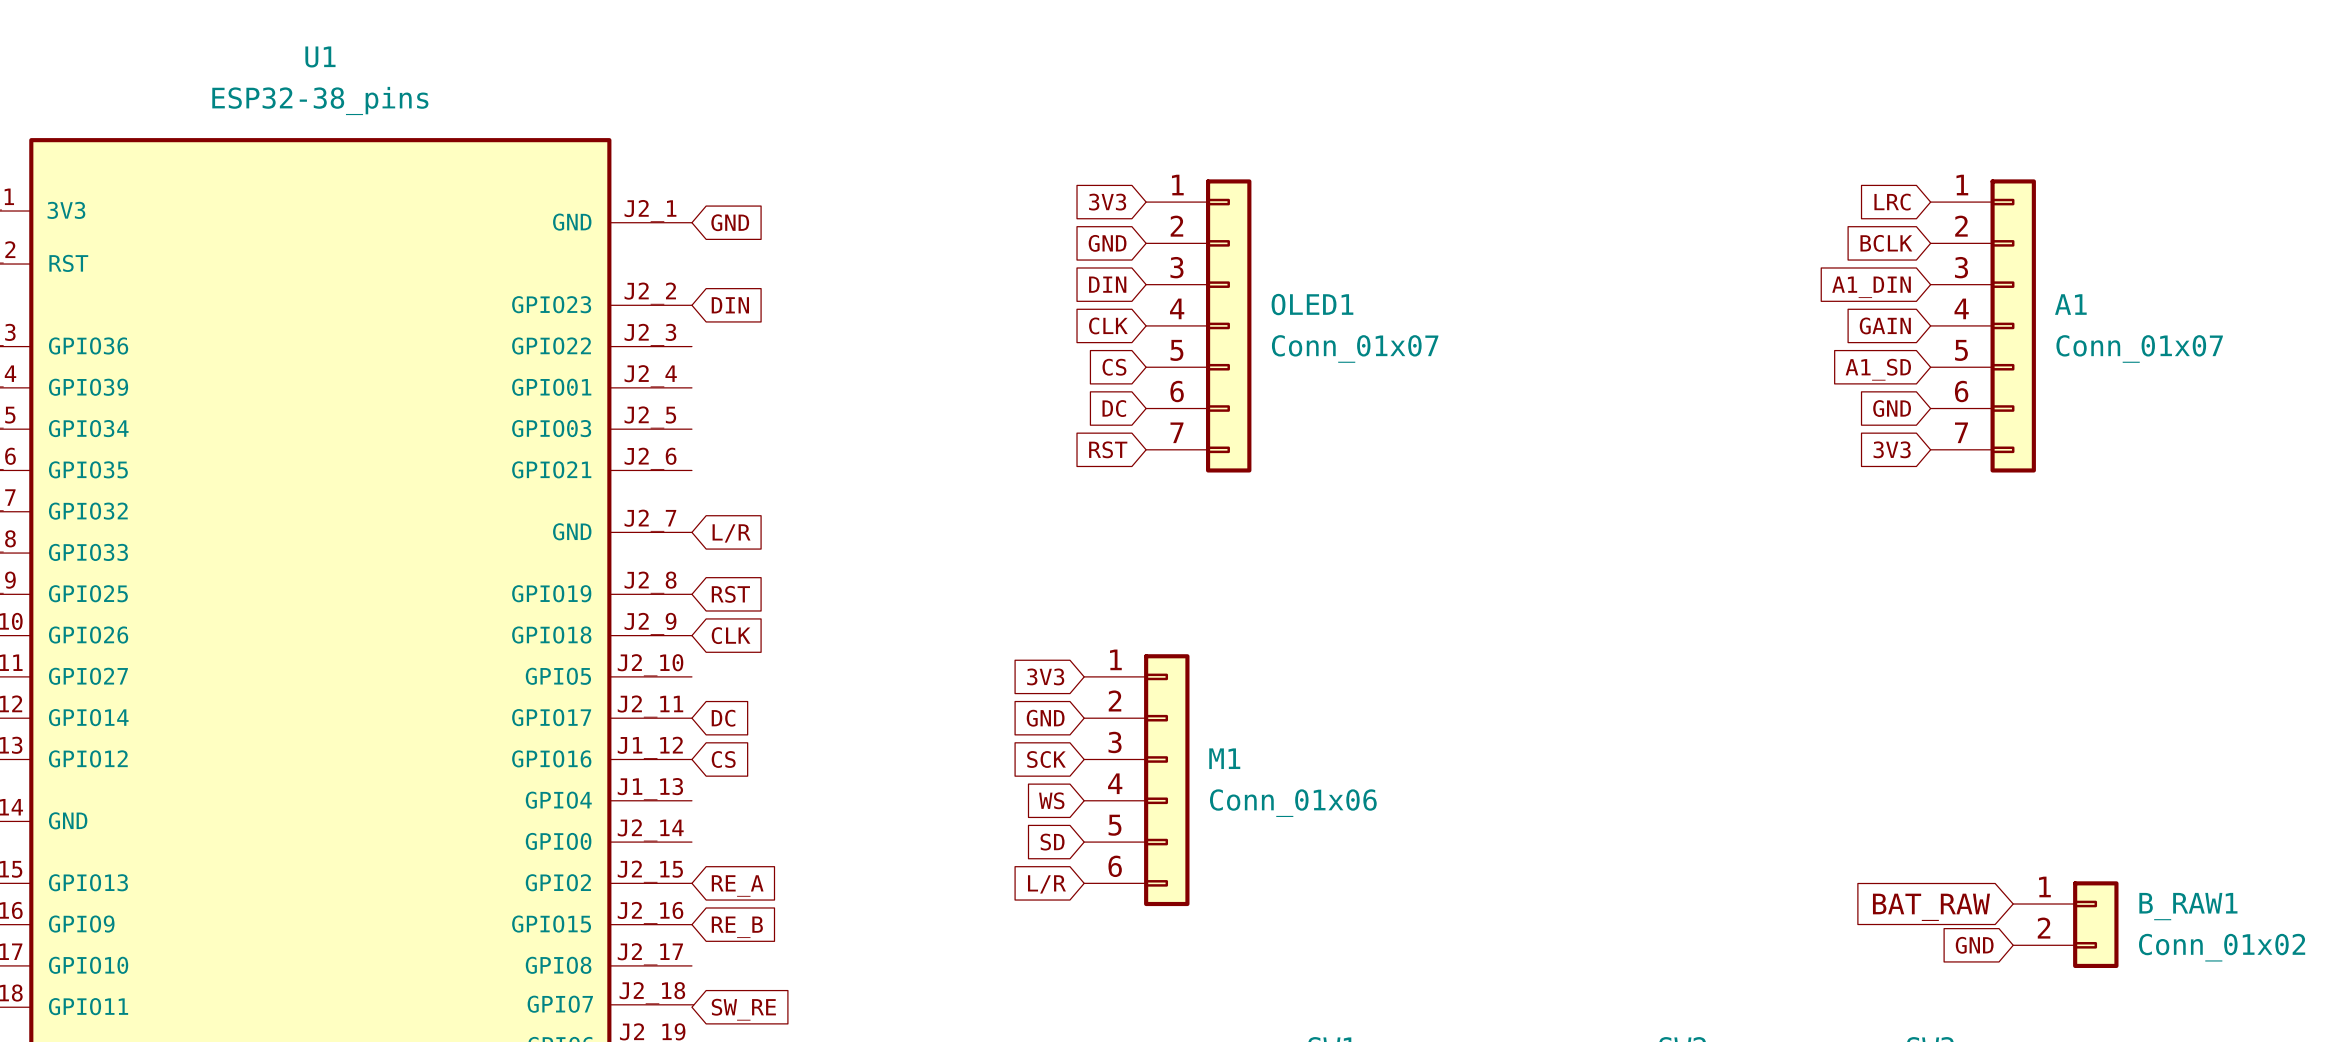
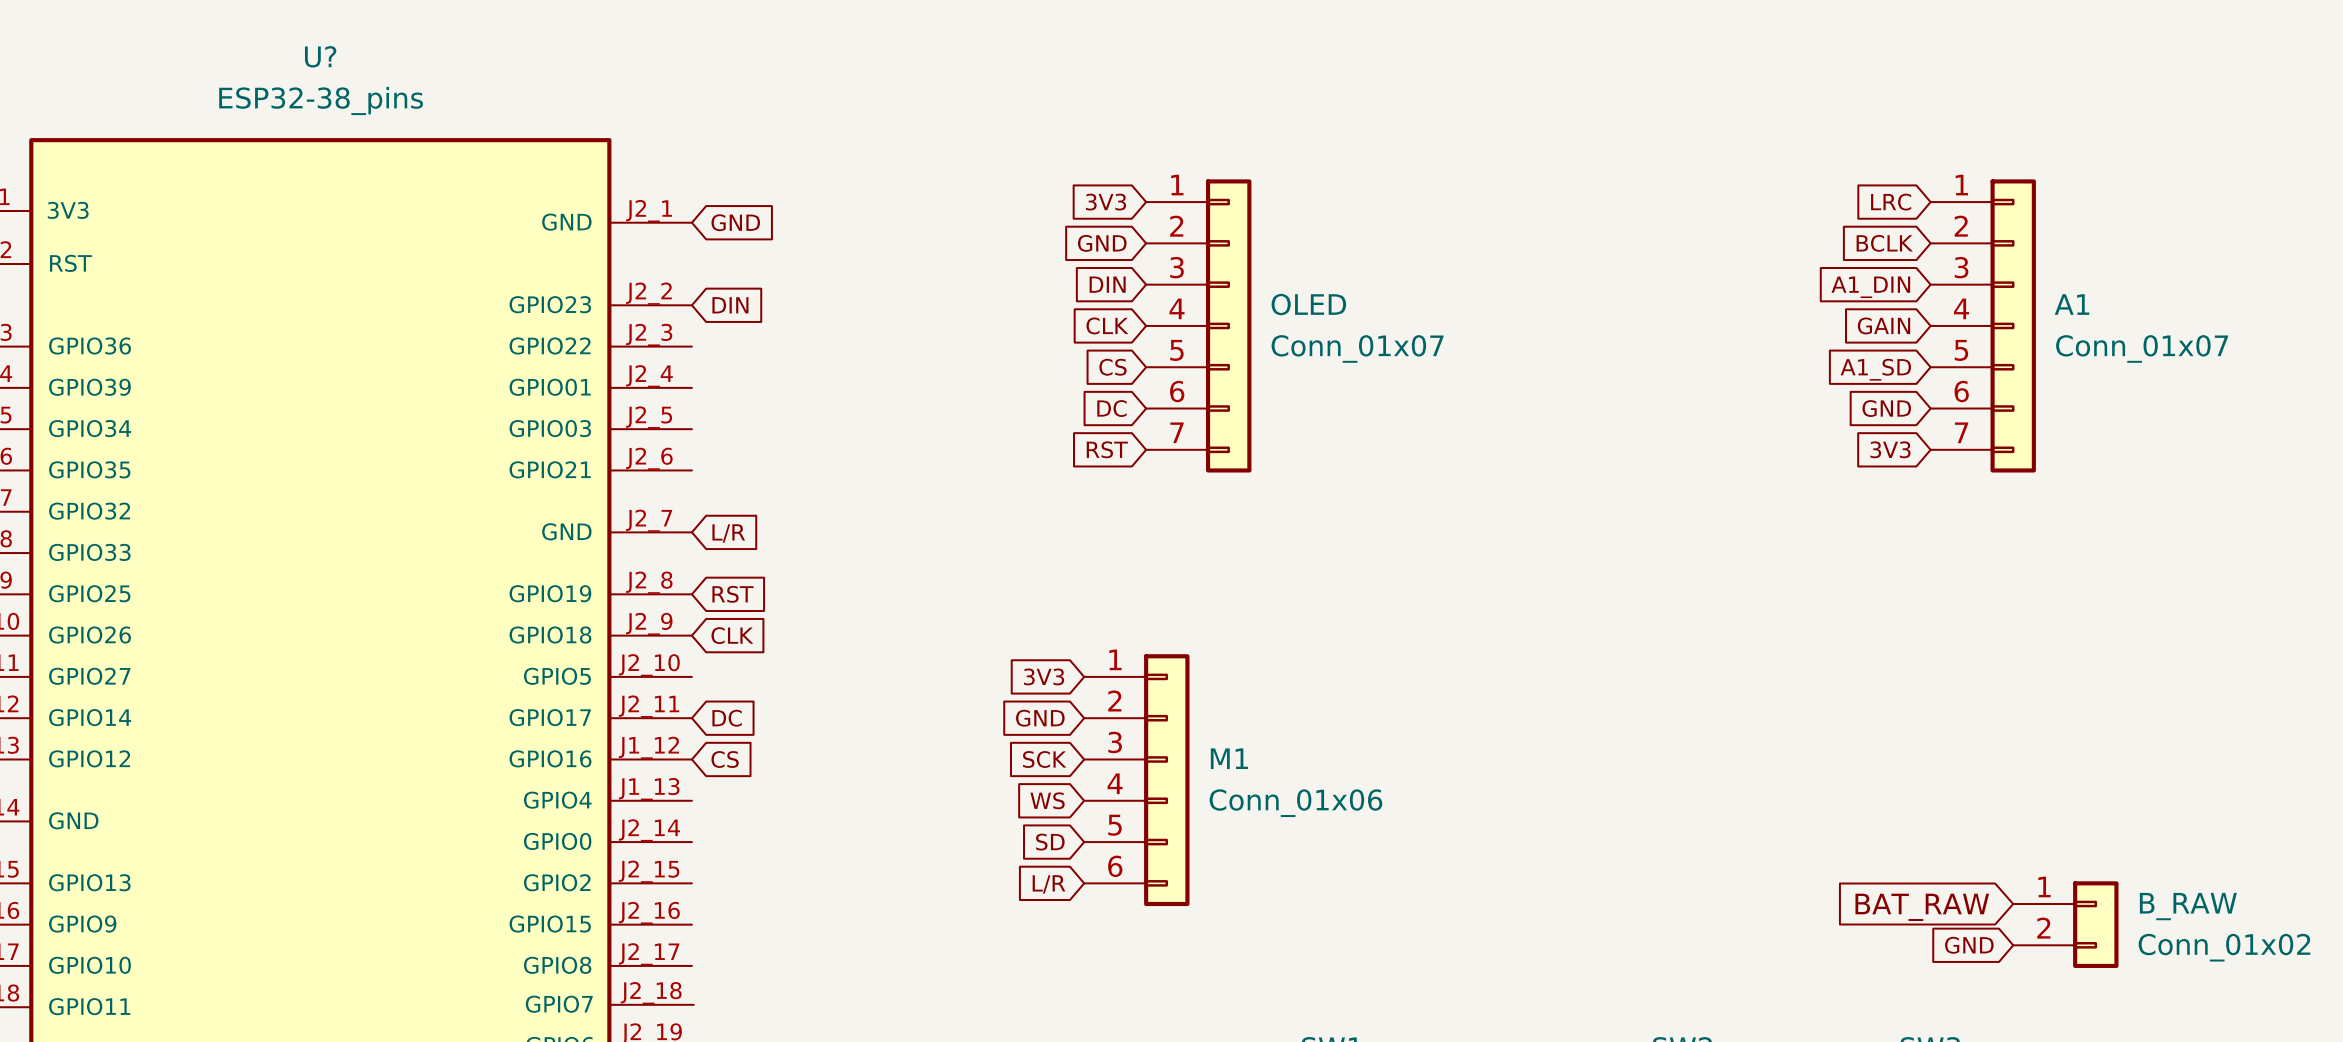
U1 name: U1 (320, 56) -> U? (320, 56)
OLED1 name: OLED1 (1312, 304) -> OLED (1308, 304)
global label: RE_A (737, 885) -> none
B_RAW1 name: B_RAW1 (2188, 906) -> B_RAW (2188, 906)
global label: RE_B (737, 927) -> none
global label: SW_RE (743, 1009) -> none

